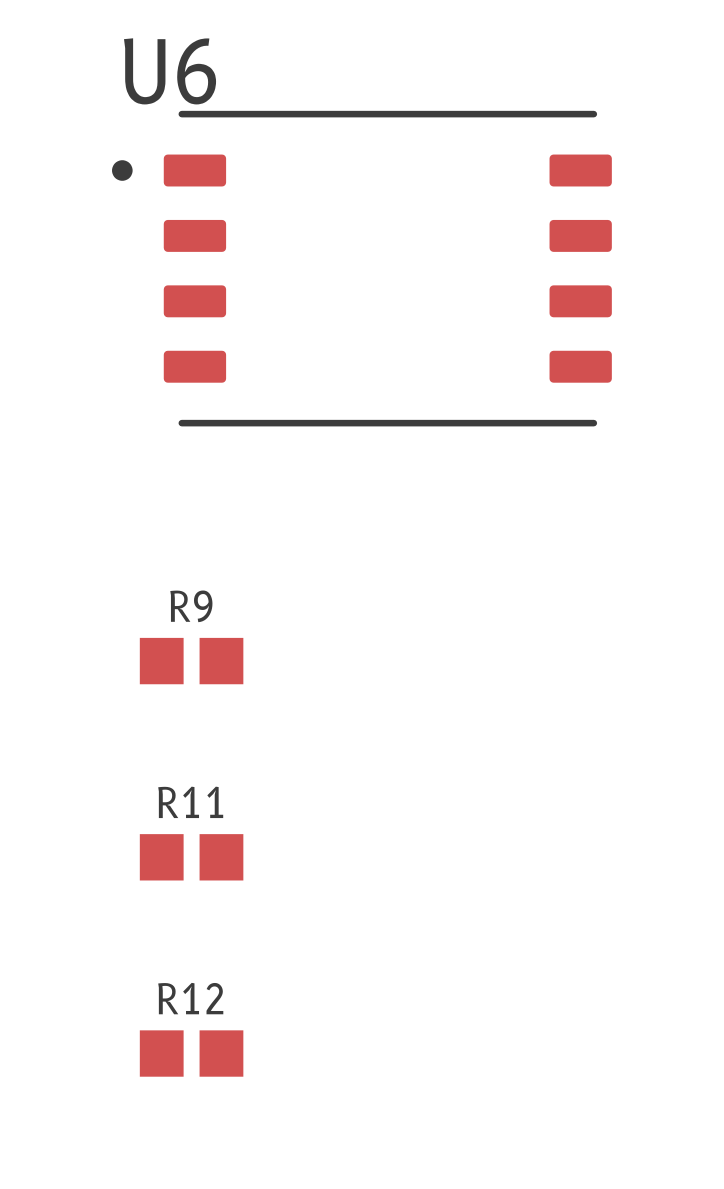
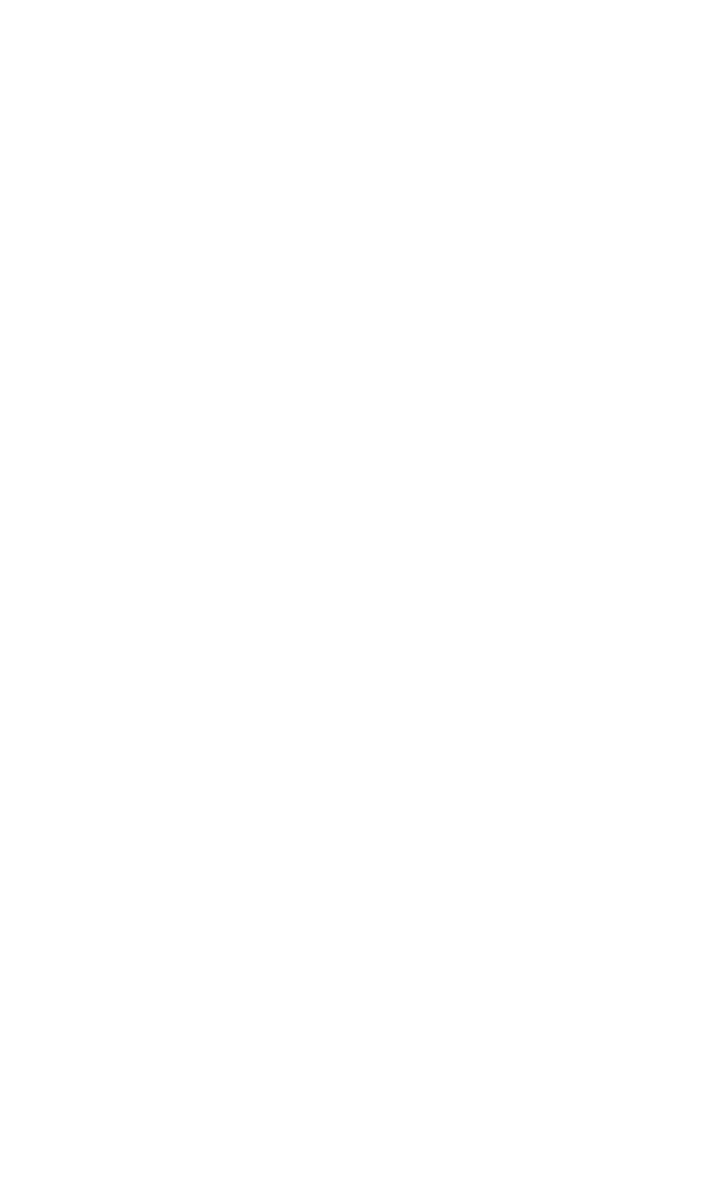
U6: (361, 268) -> none
R9: (191, 661) -> none
R11: (191, 857) -> none
R12: (191, 1053) -> none

